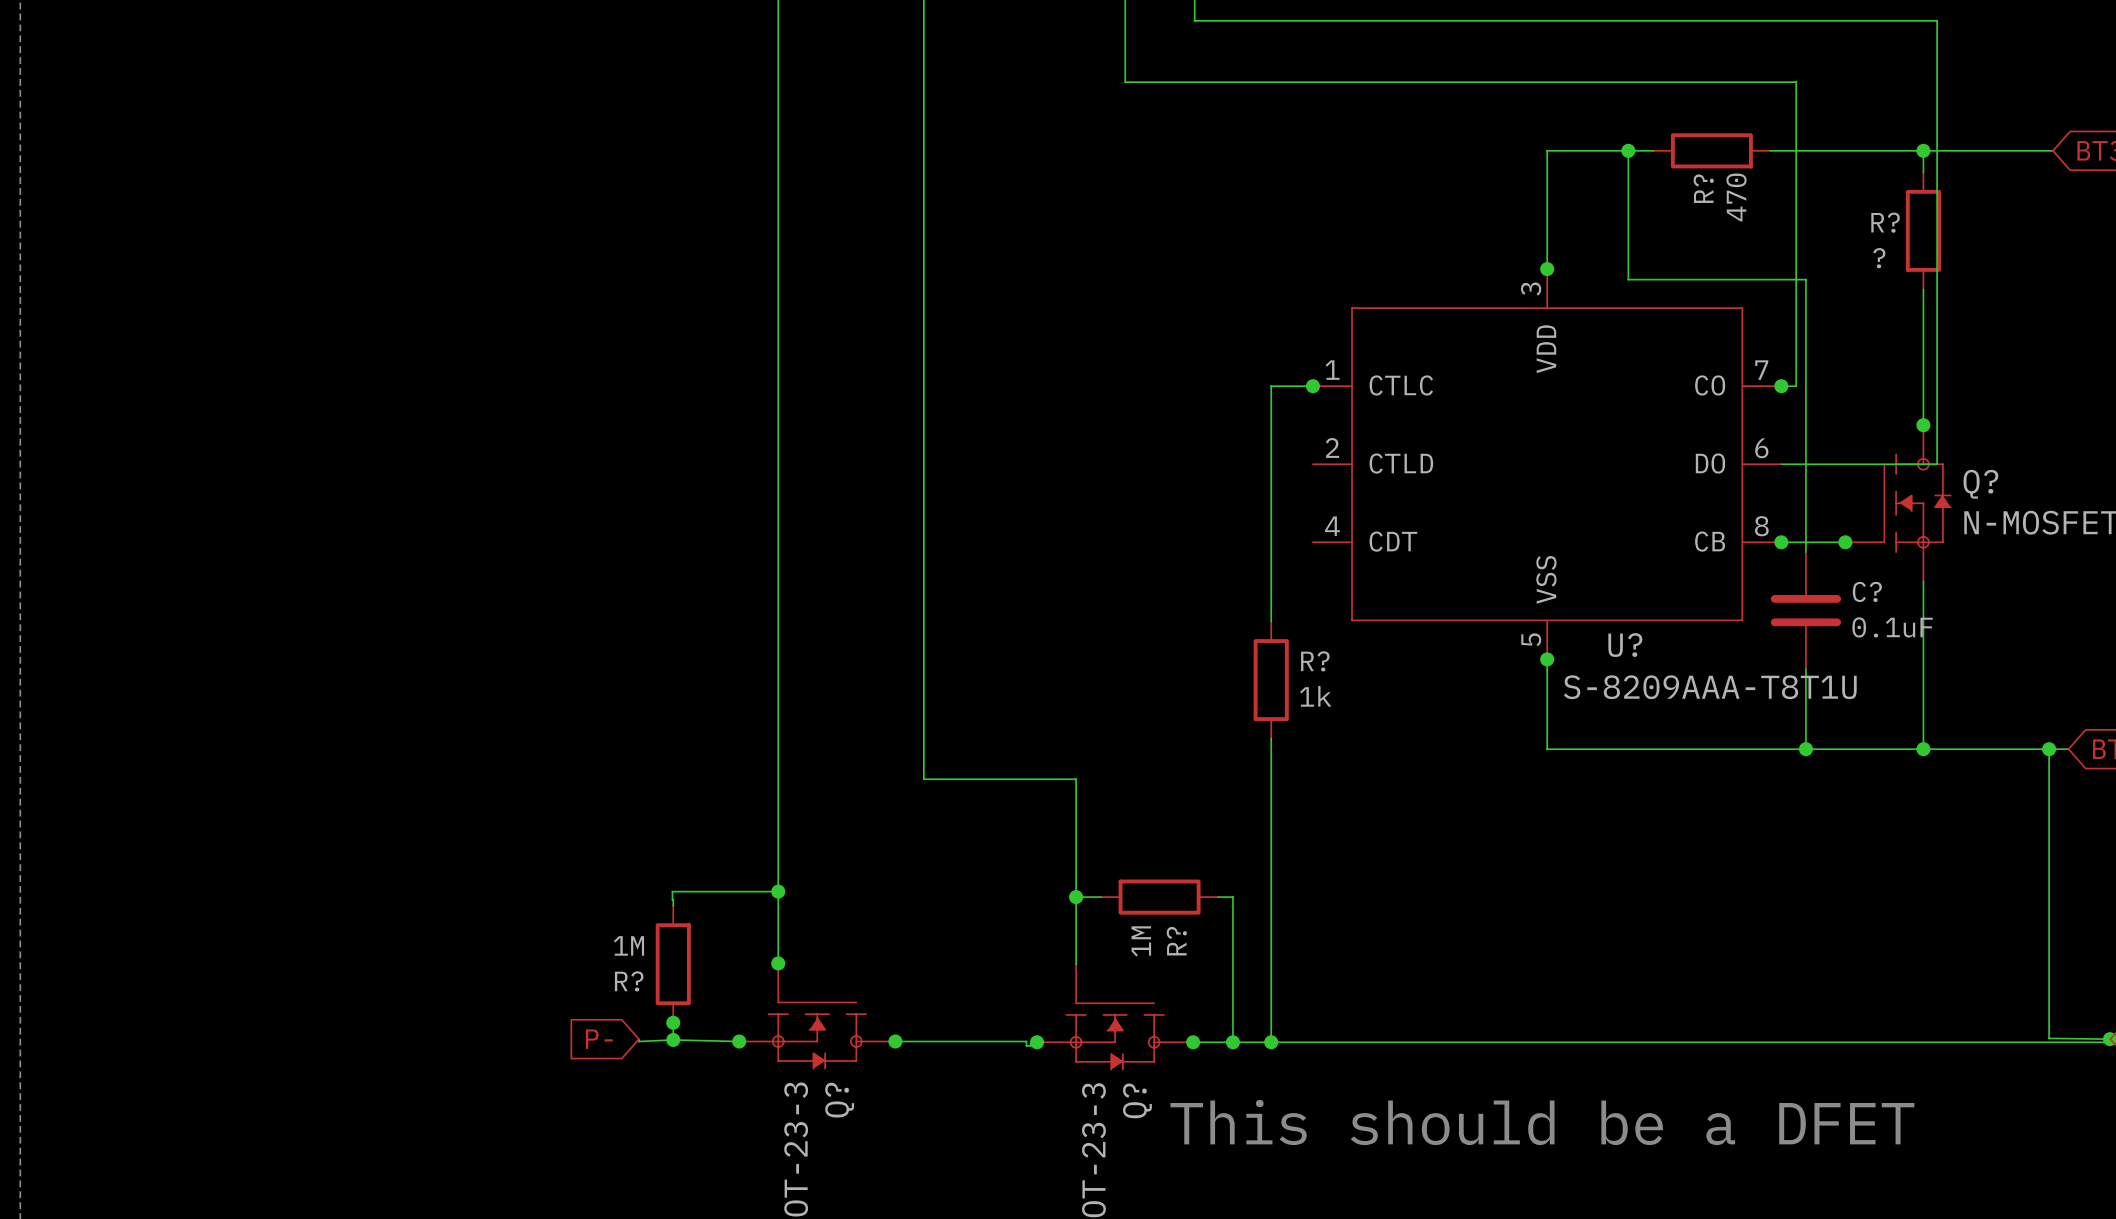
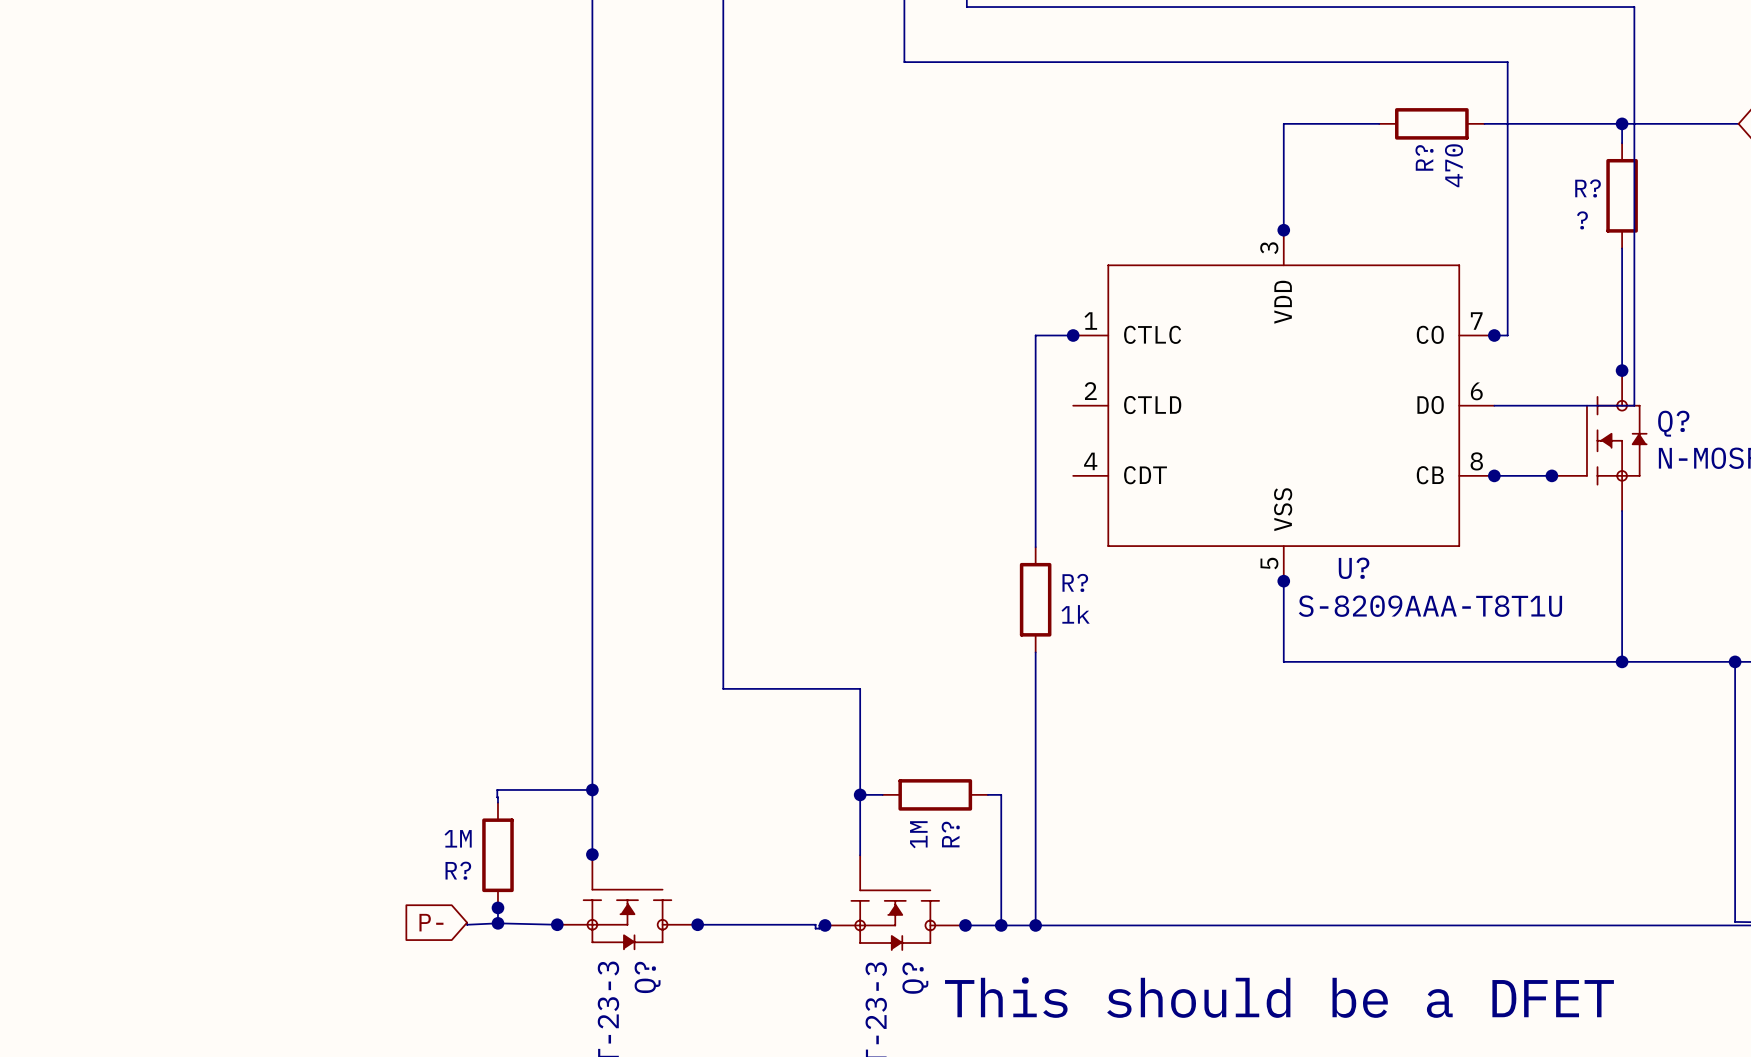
wire: (1628, 150) (1628, 279) (1805, 279) (1805, 552) -> none
junction: (1628, 150) -> none
C?: 0.1uF (1805, 610) -> none
wire: (1805, 669) (1805, 749) -> none
junction: (1805, 749) -> none

